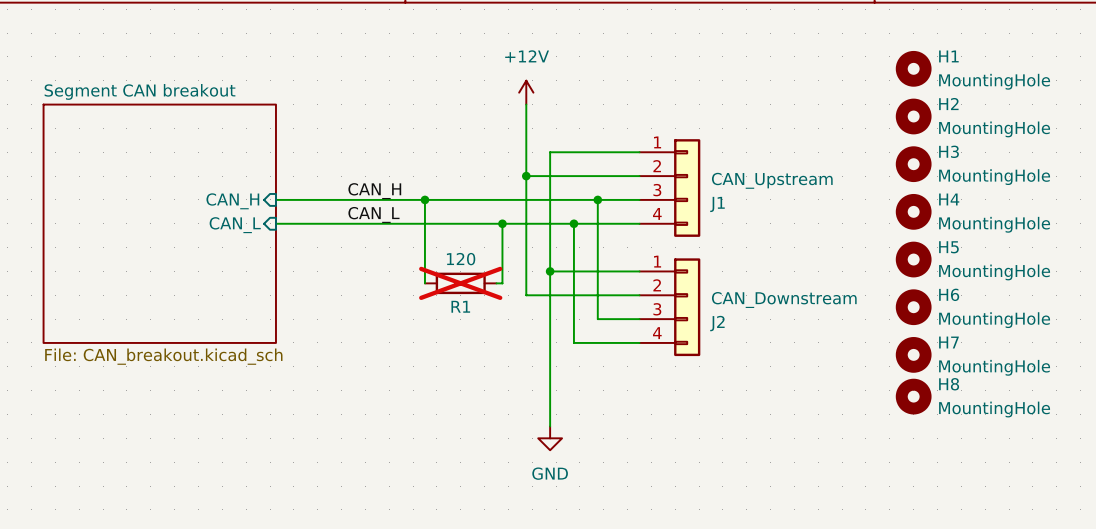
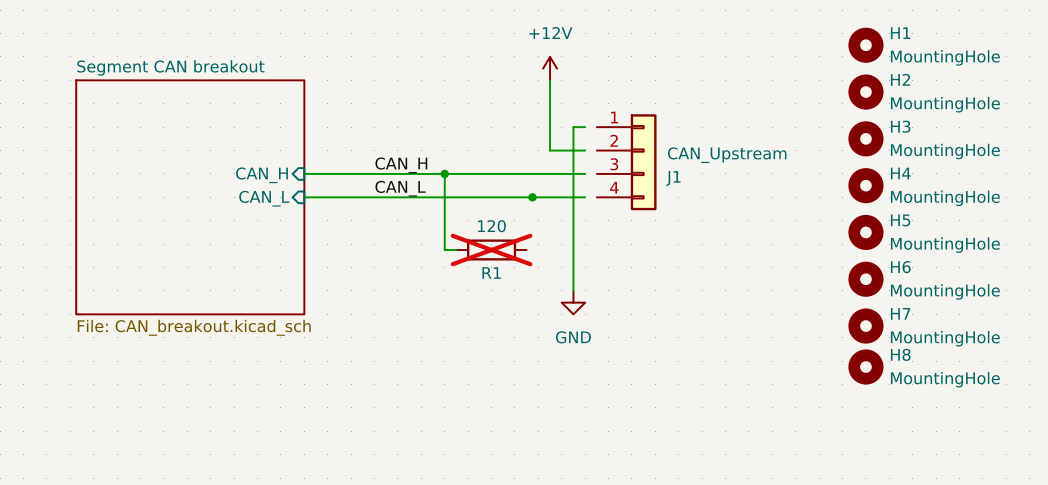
power symbol position: +12V (526, 92) -> +12V (550, 68)
wire: (526, 104) (526, 295) (639, 295) -> none
wire: (615, 152) (550, 152) (550, 426) -> (573, 127) (573, 290)
wire: (627, 152) (639, 152) -> none
wire: (526, 176) (591, 176) -> (550, 80) (550, 150)
junction: (526, 176) -> none
wire: (627, 176) (639, 176) -> none
label position: CAN_H (374, 191) -> CAN_H (401, 165)
wire: (275, 199) (341, 199) -> none
wire: (424, 199) (424, 283) -> none
junction: (424, 199) -> none
wire: none -> (444, 173) (444, 250) (456, 250)
junction: none -> (444, 173)
wire: (597, 199) (597, 319) (639, 319) -> none
junction: (597, 199) -> none
wire: (627, 199) (639, 199) -> none
sheet pin position: CAN_H (232, 201) -> CAN_H (262, 175)
label position: CAN_L (373, 214) -> CAN_L (400, 188)
sheet Segment CAN breakout position: (159, 223) -> (190, 197)
wire: (275, 223) (341, 223) -> none
wire: (502, 223) (502, 283) (496, 283) -> none
junction: (502, 223) -> none
wire: (573, 223) (573, 342) (639, 342) -> none
wire: (627, 223) (639, 223) -> none
sheet pin position: CAN_L (235, 225) -> CAN_L (264, 198)
wire: (550, 271) (639, 271) -> none
junction: (550, 271) -> none
R1 position: (460, 283) -> (491, 250)
J2: CAN_Downstream (669, 307) -> none
power symbol position: GND (550, 438) -> GND (573, 302)

